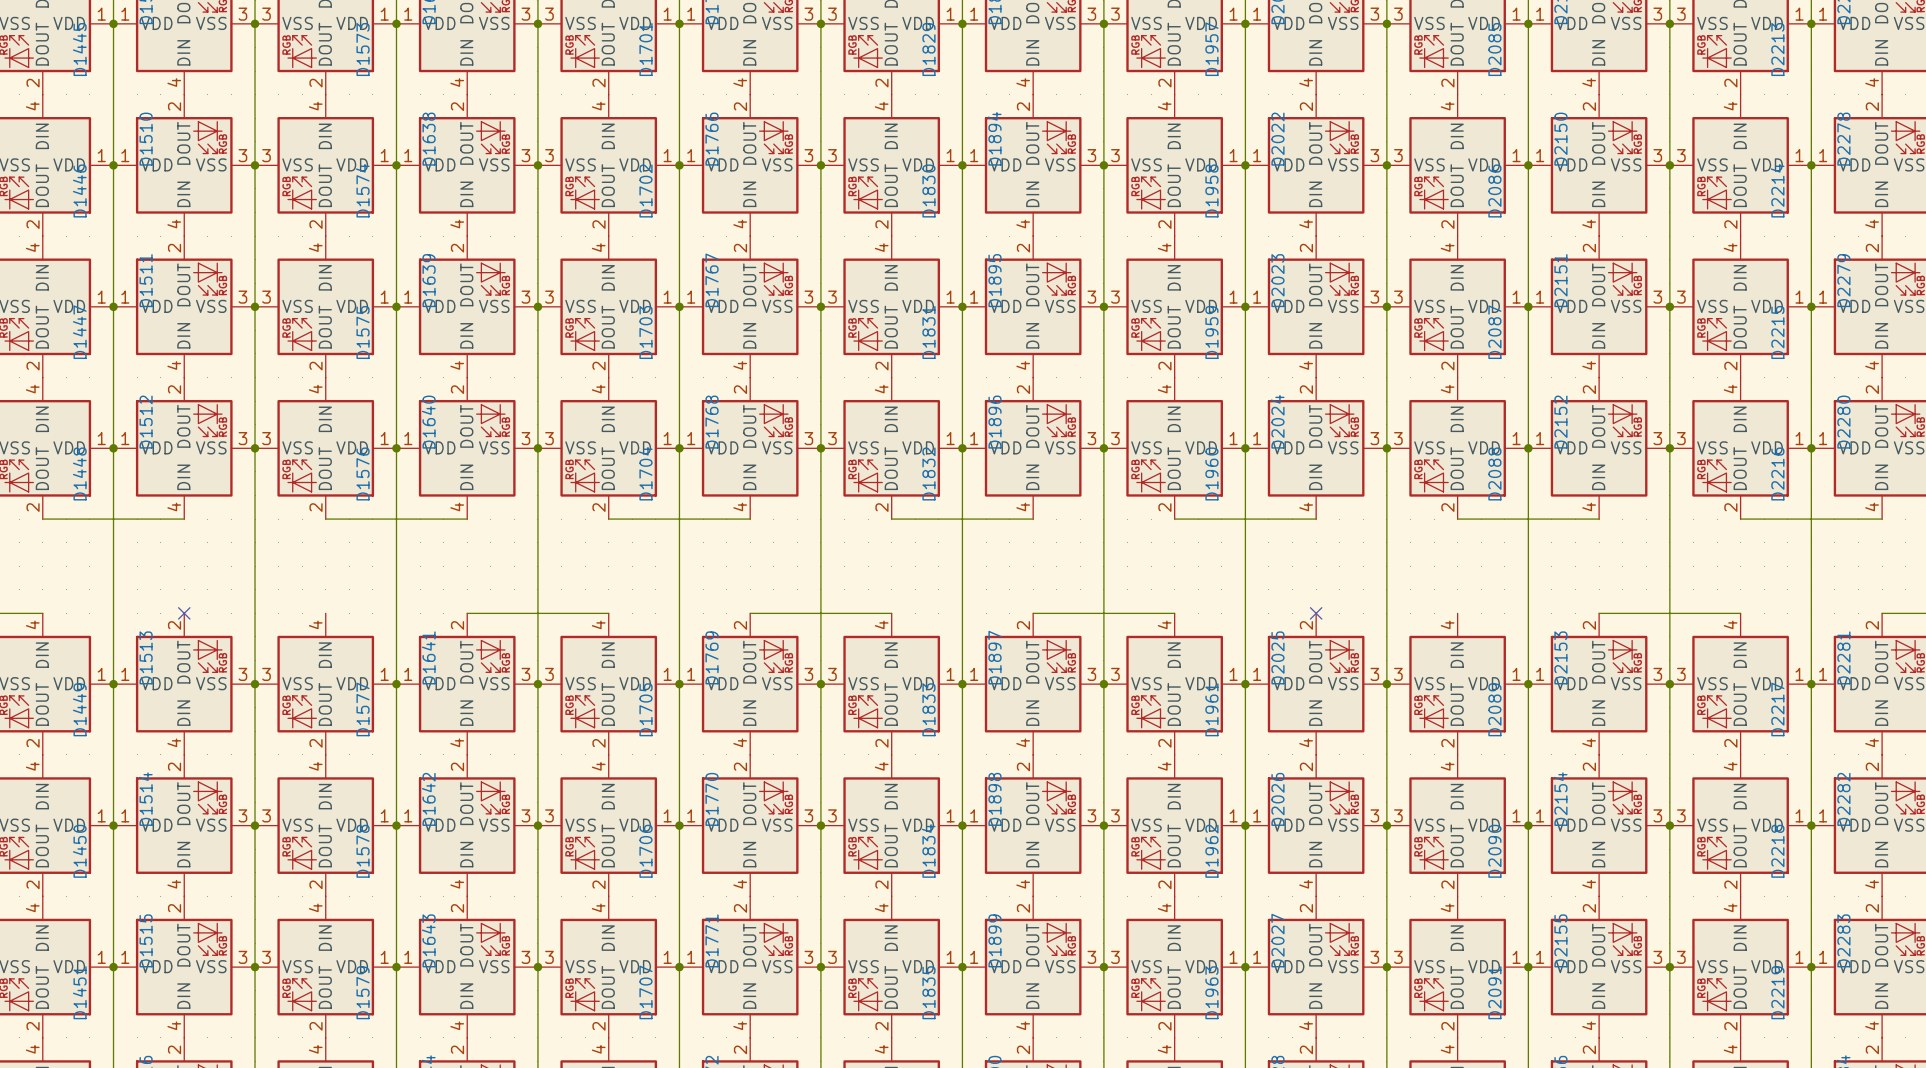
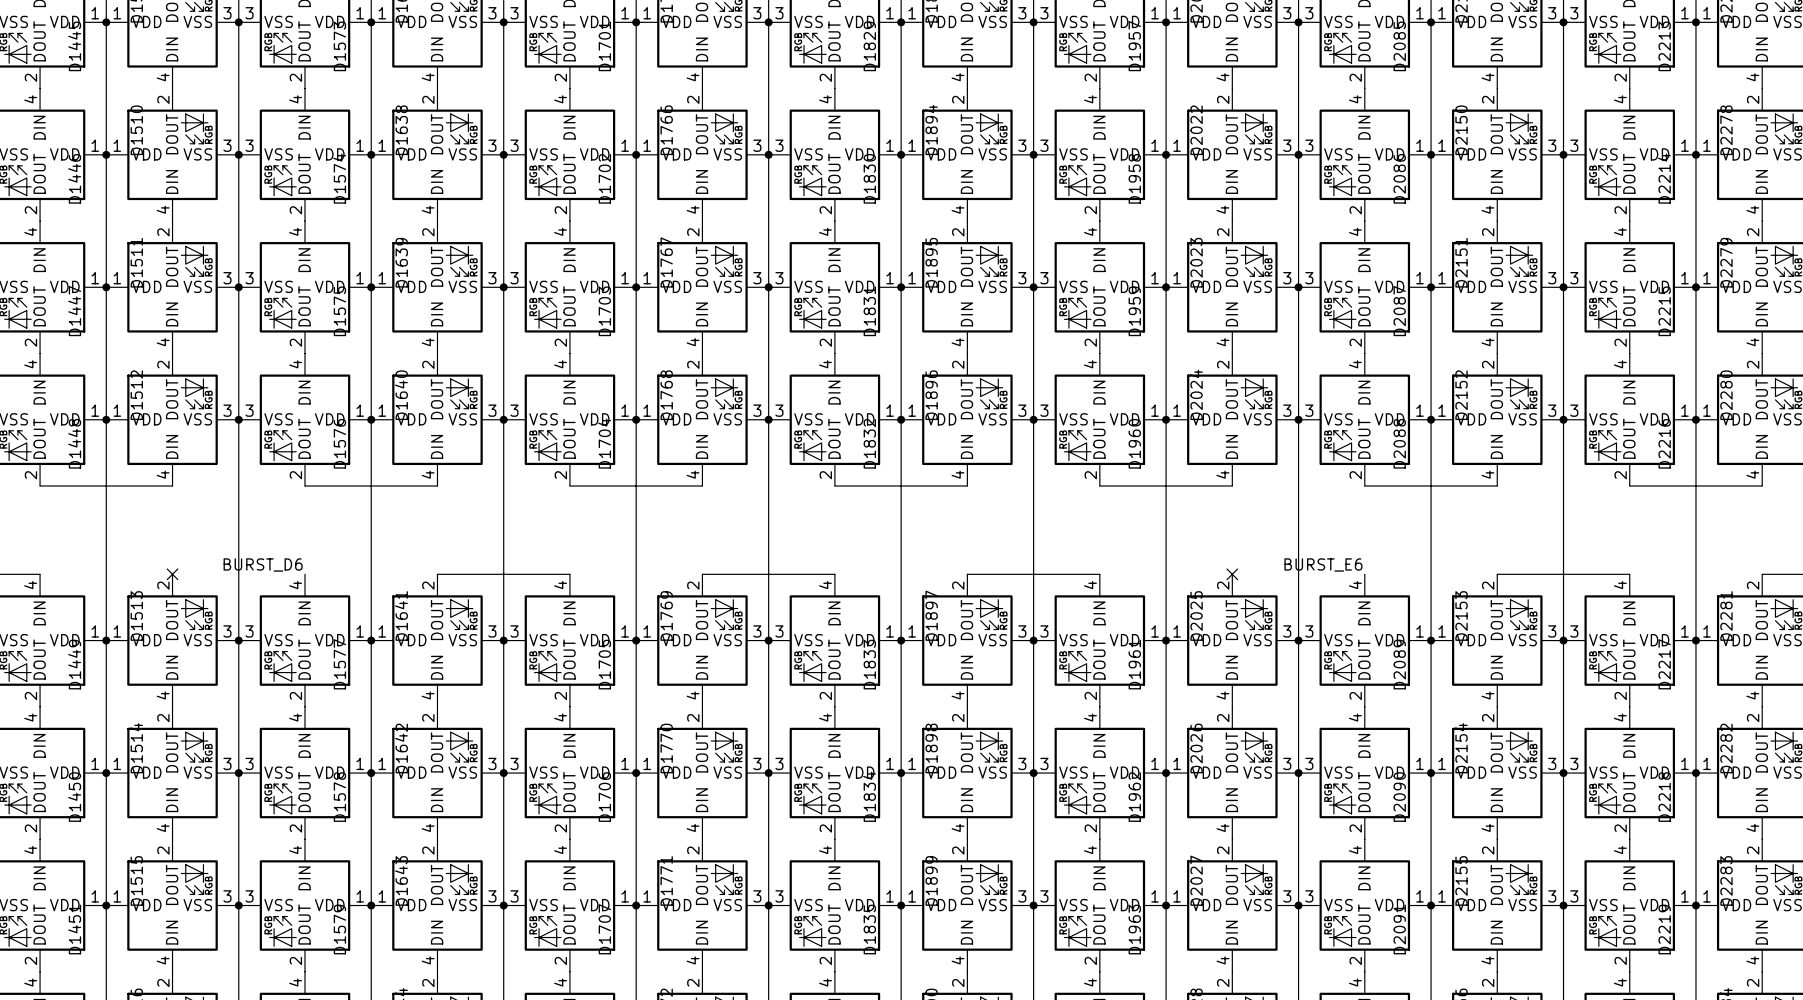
label: none -> BURST_D6 (263, 564)
label: none -> BURST_E6 (1323, 564)

